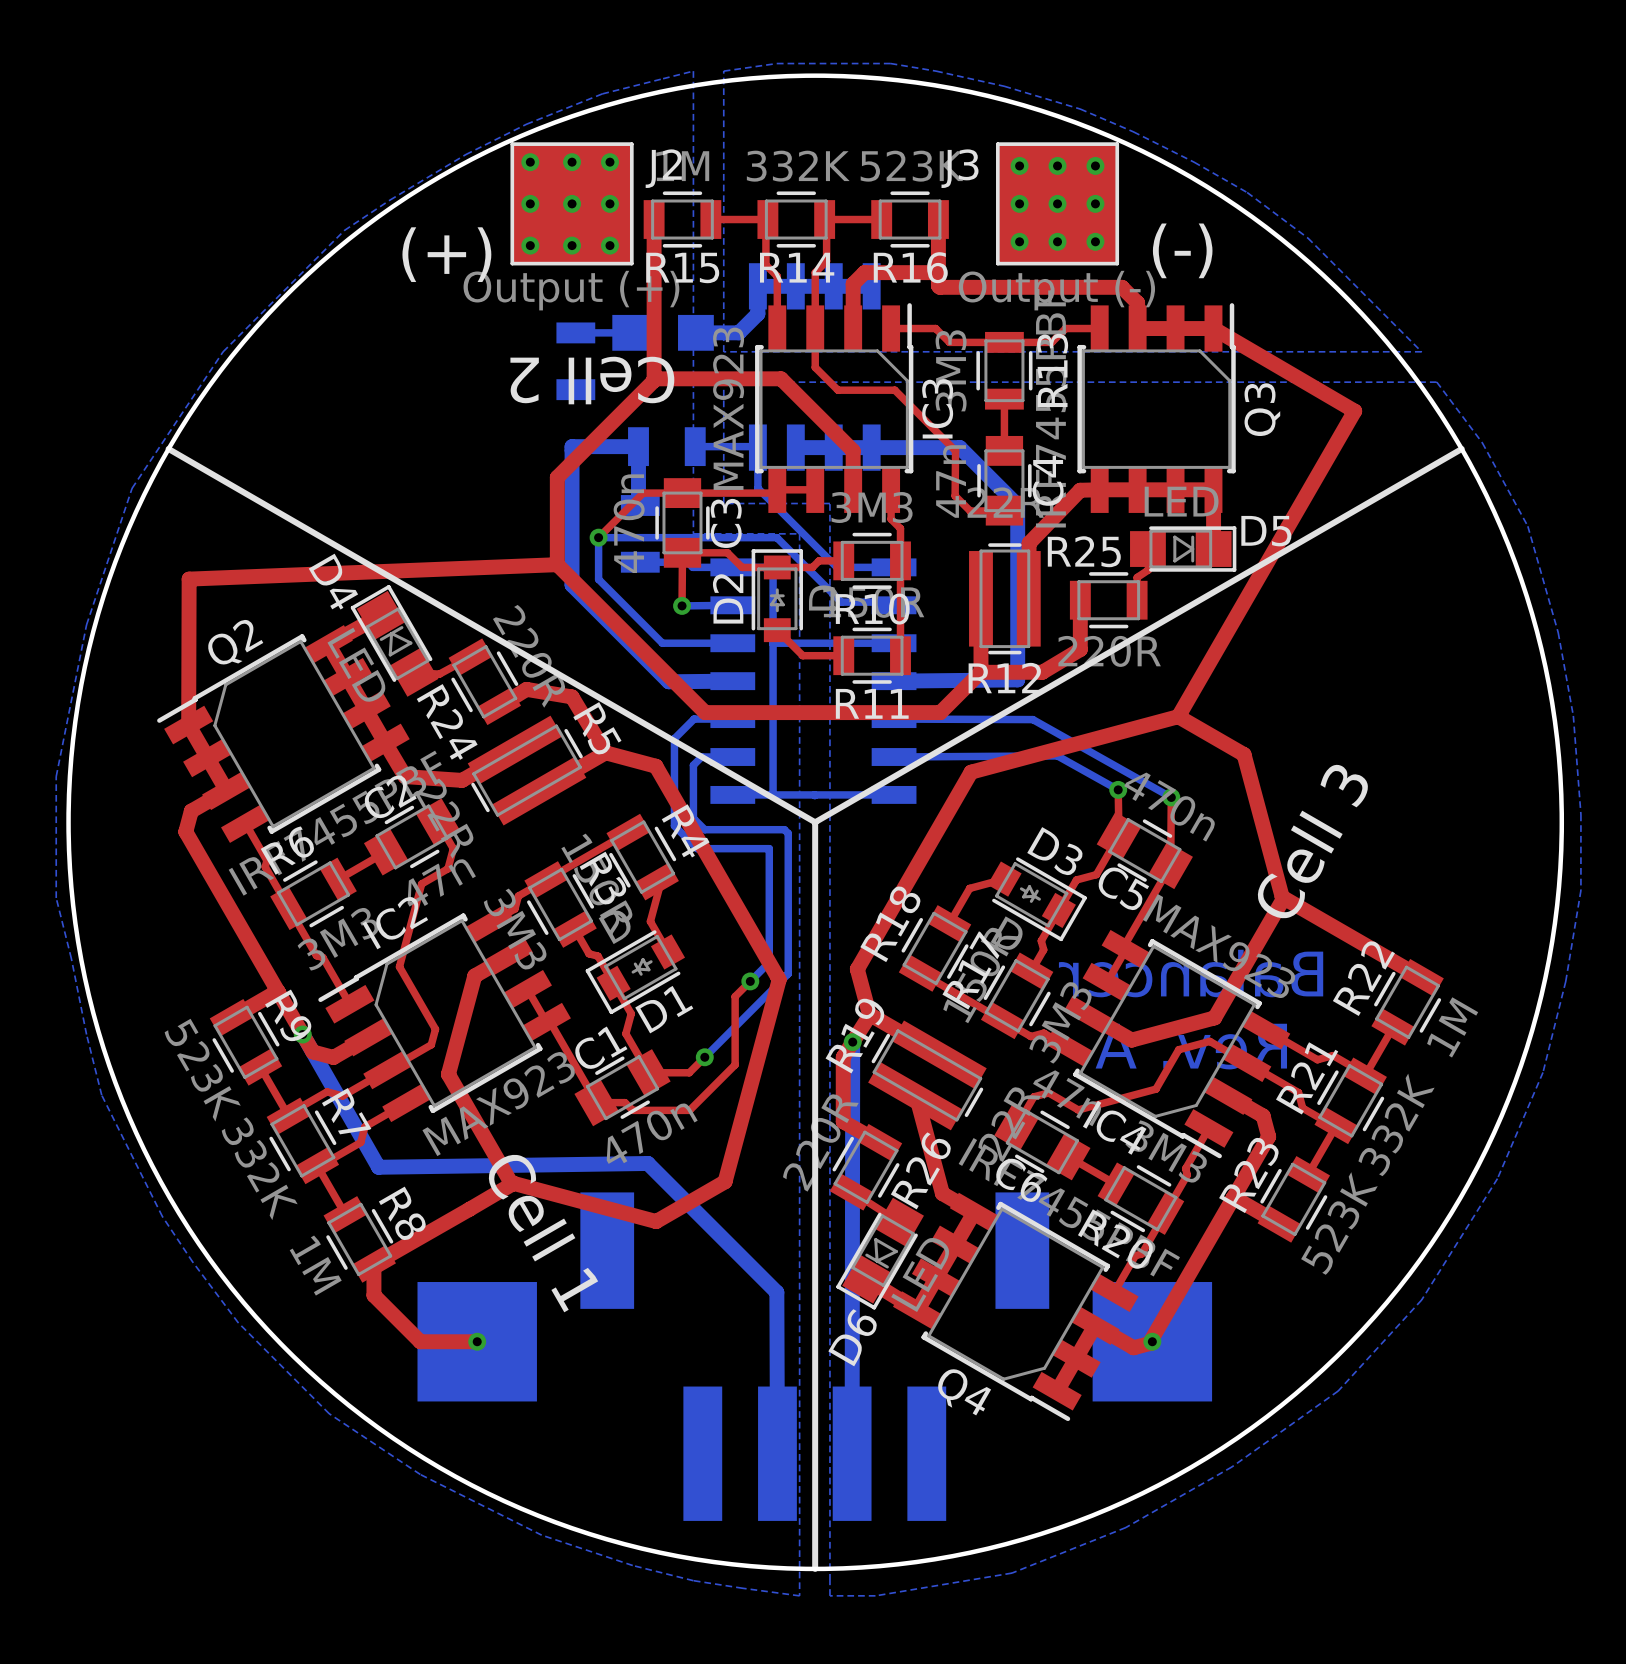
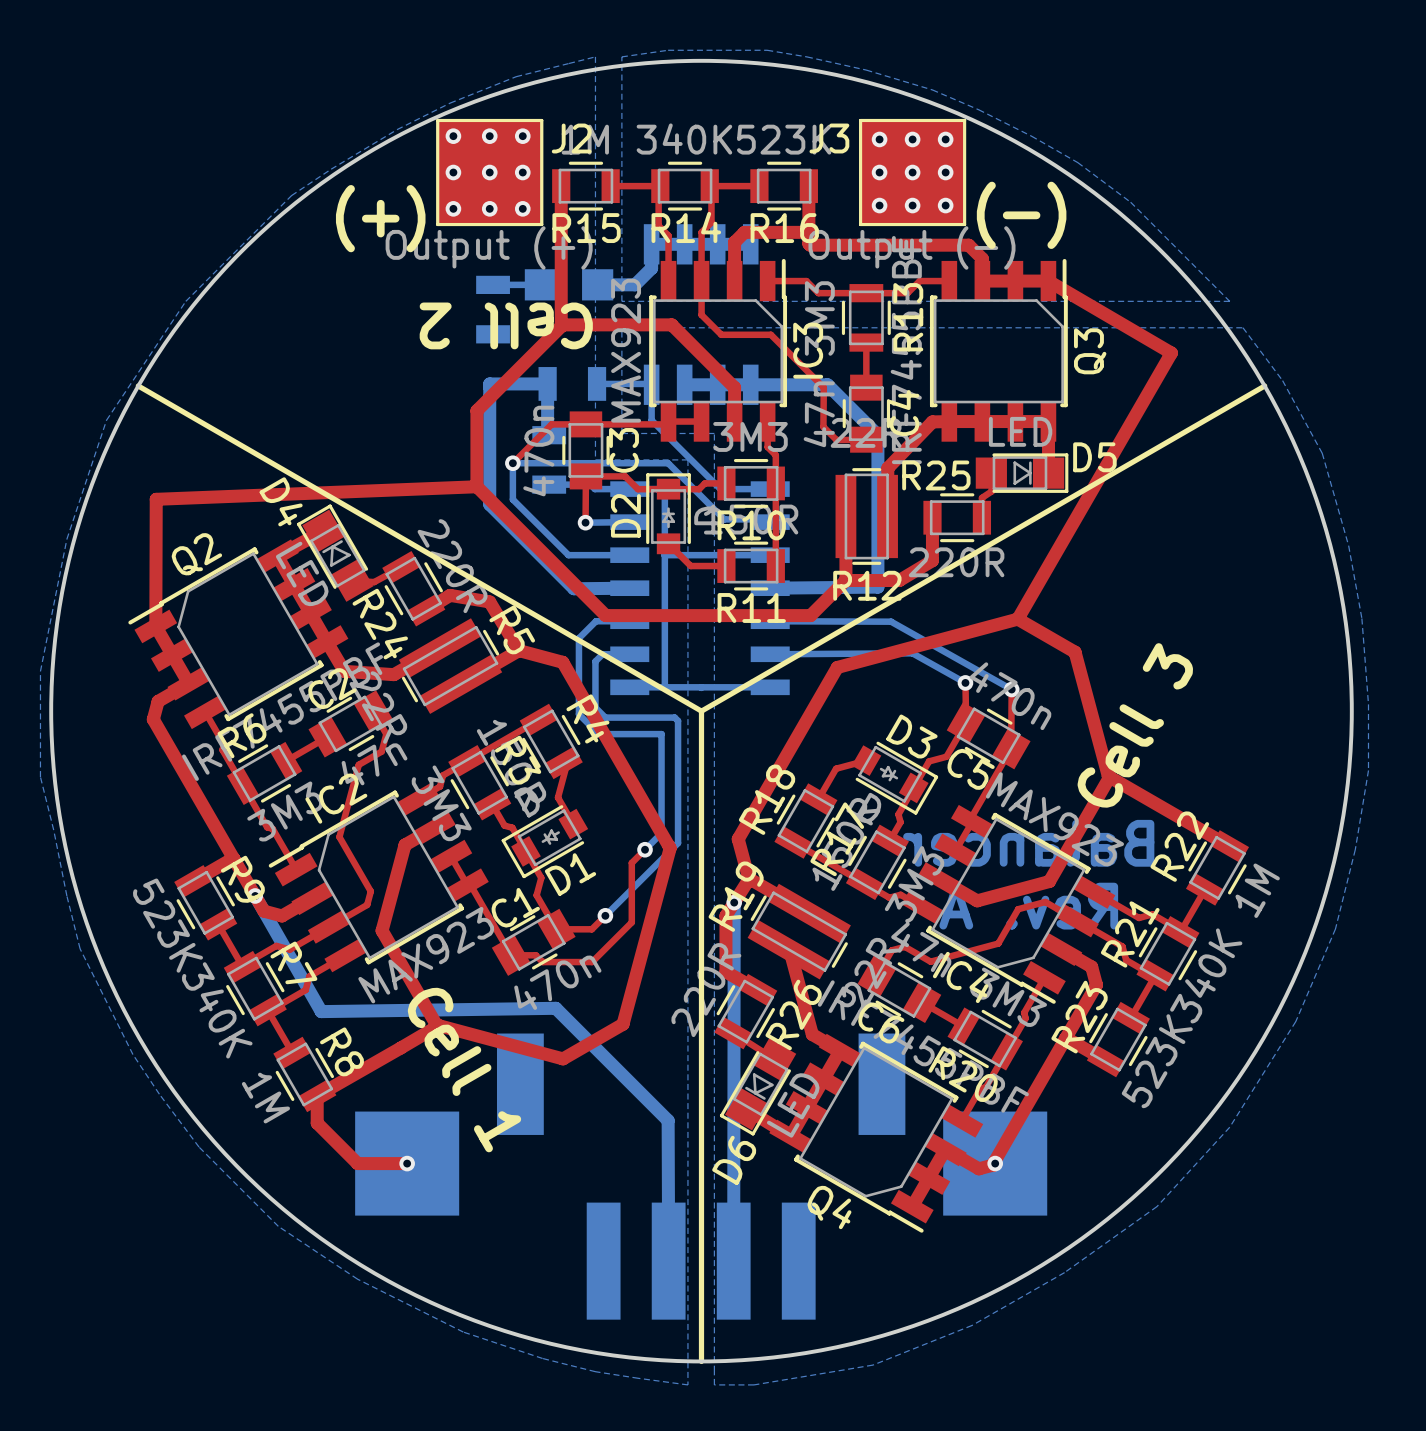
R14 value: 332K (798, 166) -> 340K (684, 139)
R21 value: 332K (1396, 1124) -> 340K (1206, 975)
R7 value: 332K (259, 1168) -> 340K (217, 1010)

